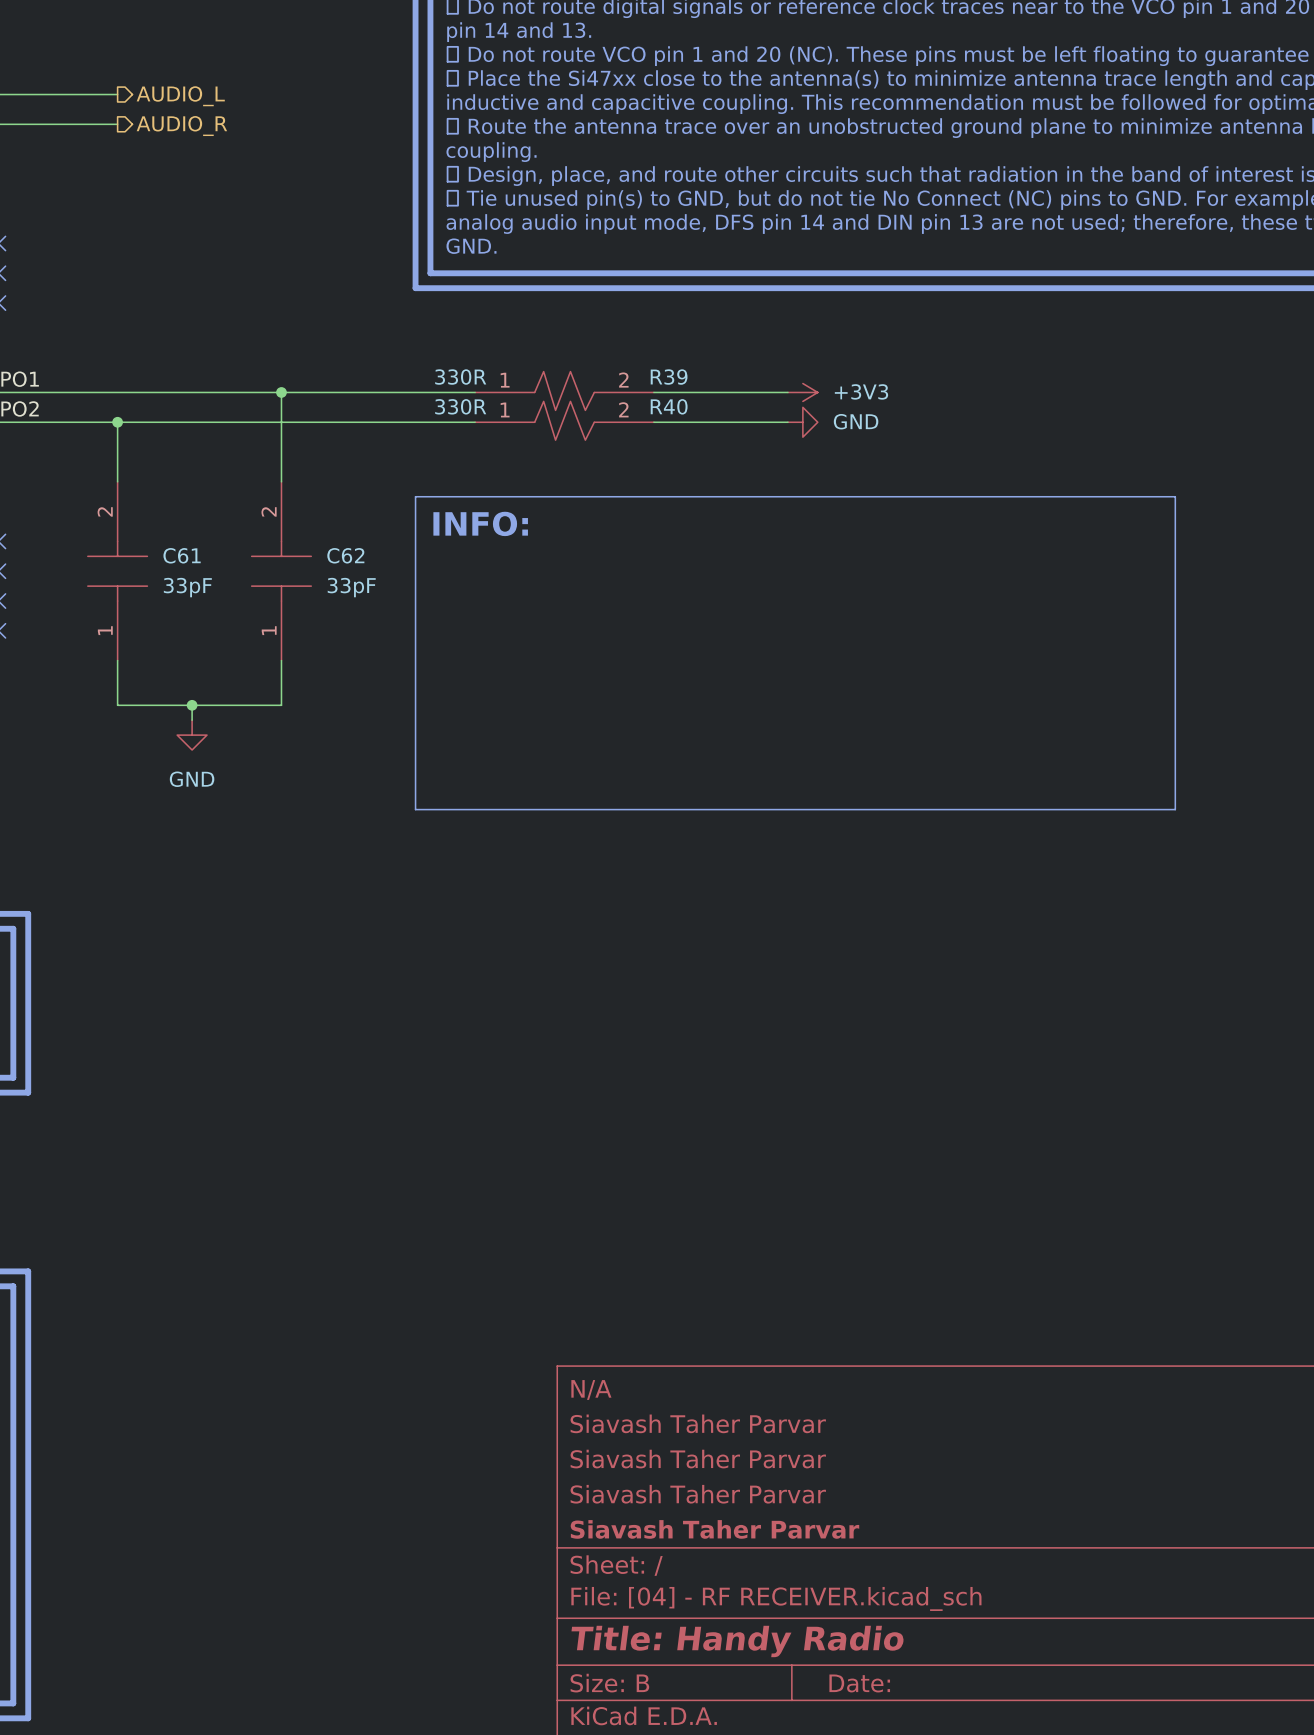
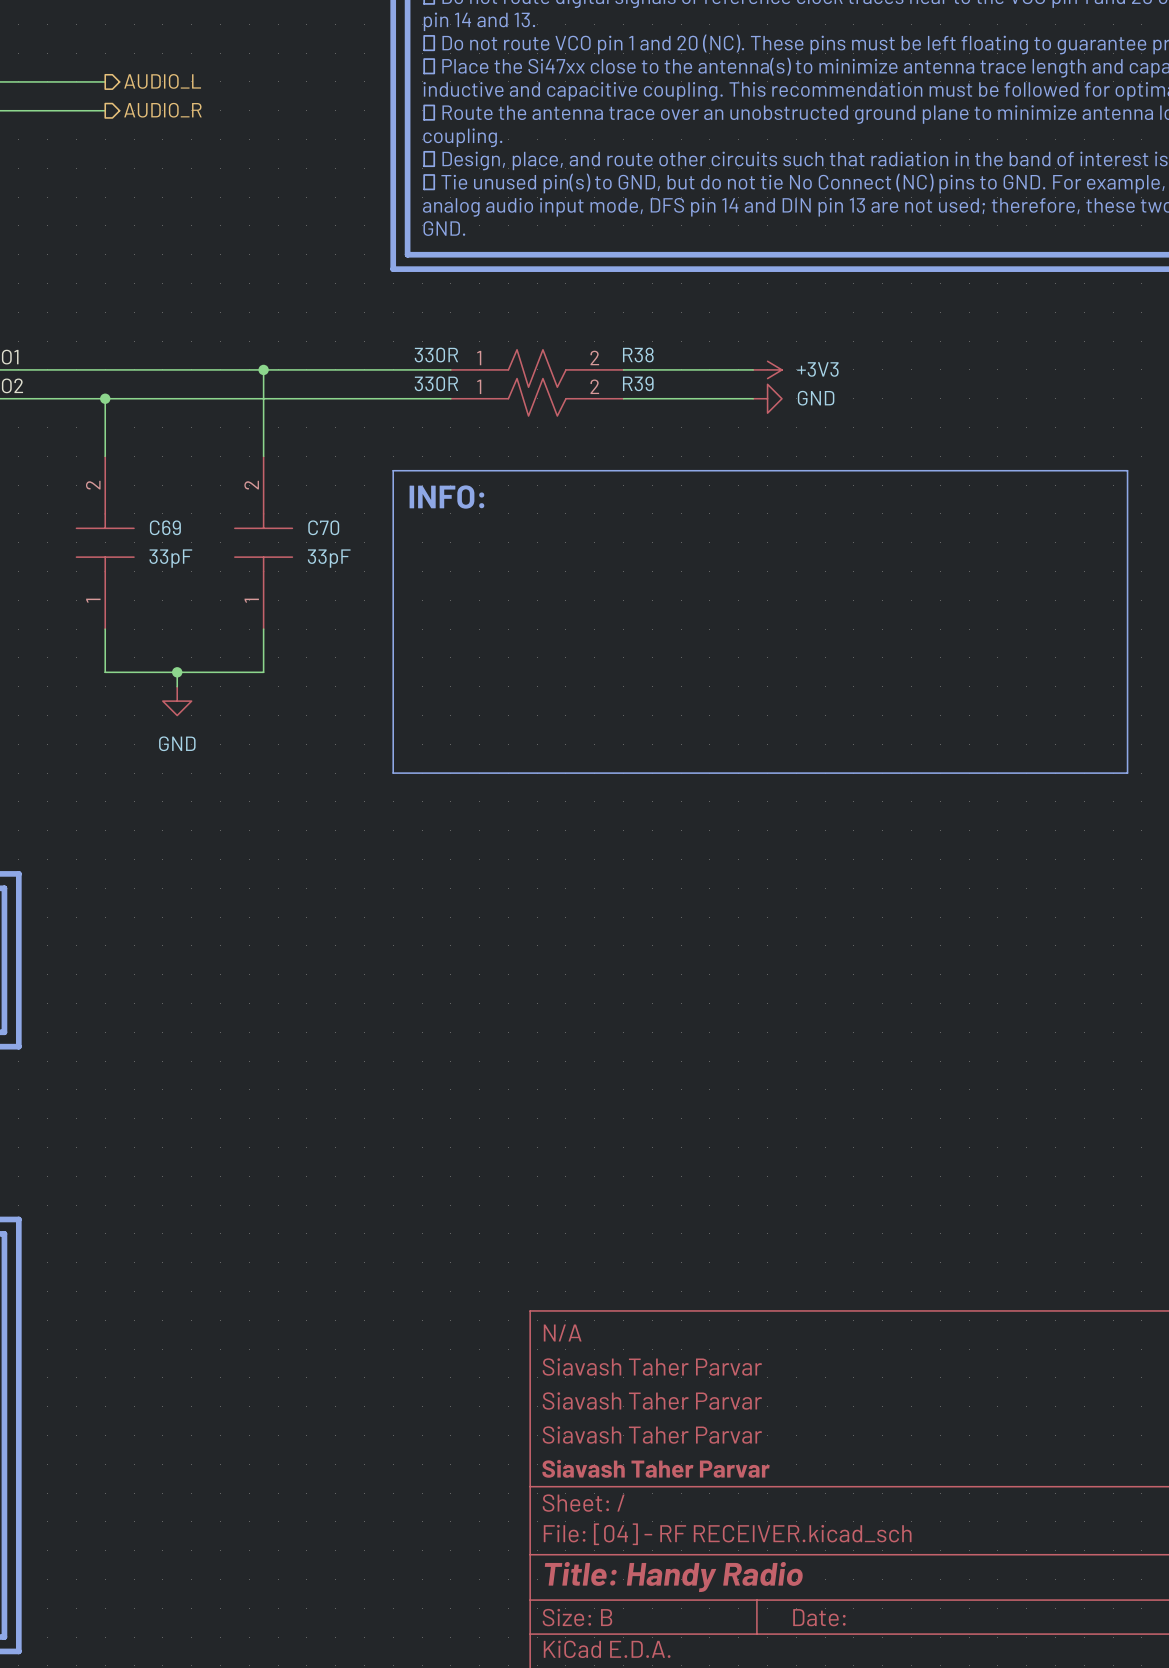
R39 name: R39 (669, 377) -> R38 (638, 354)
R40 name: R40 (669, 406) -> R39 (638, 383)
C61 name: C61 (182, 555) -> C69 (165, 527)
C62 name: C62 (345, 555) -> C70 (323, 527)

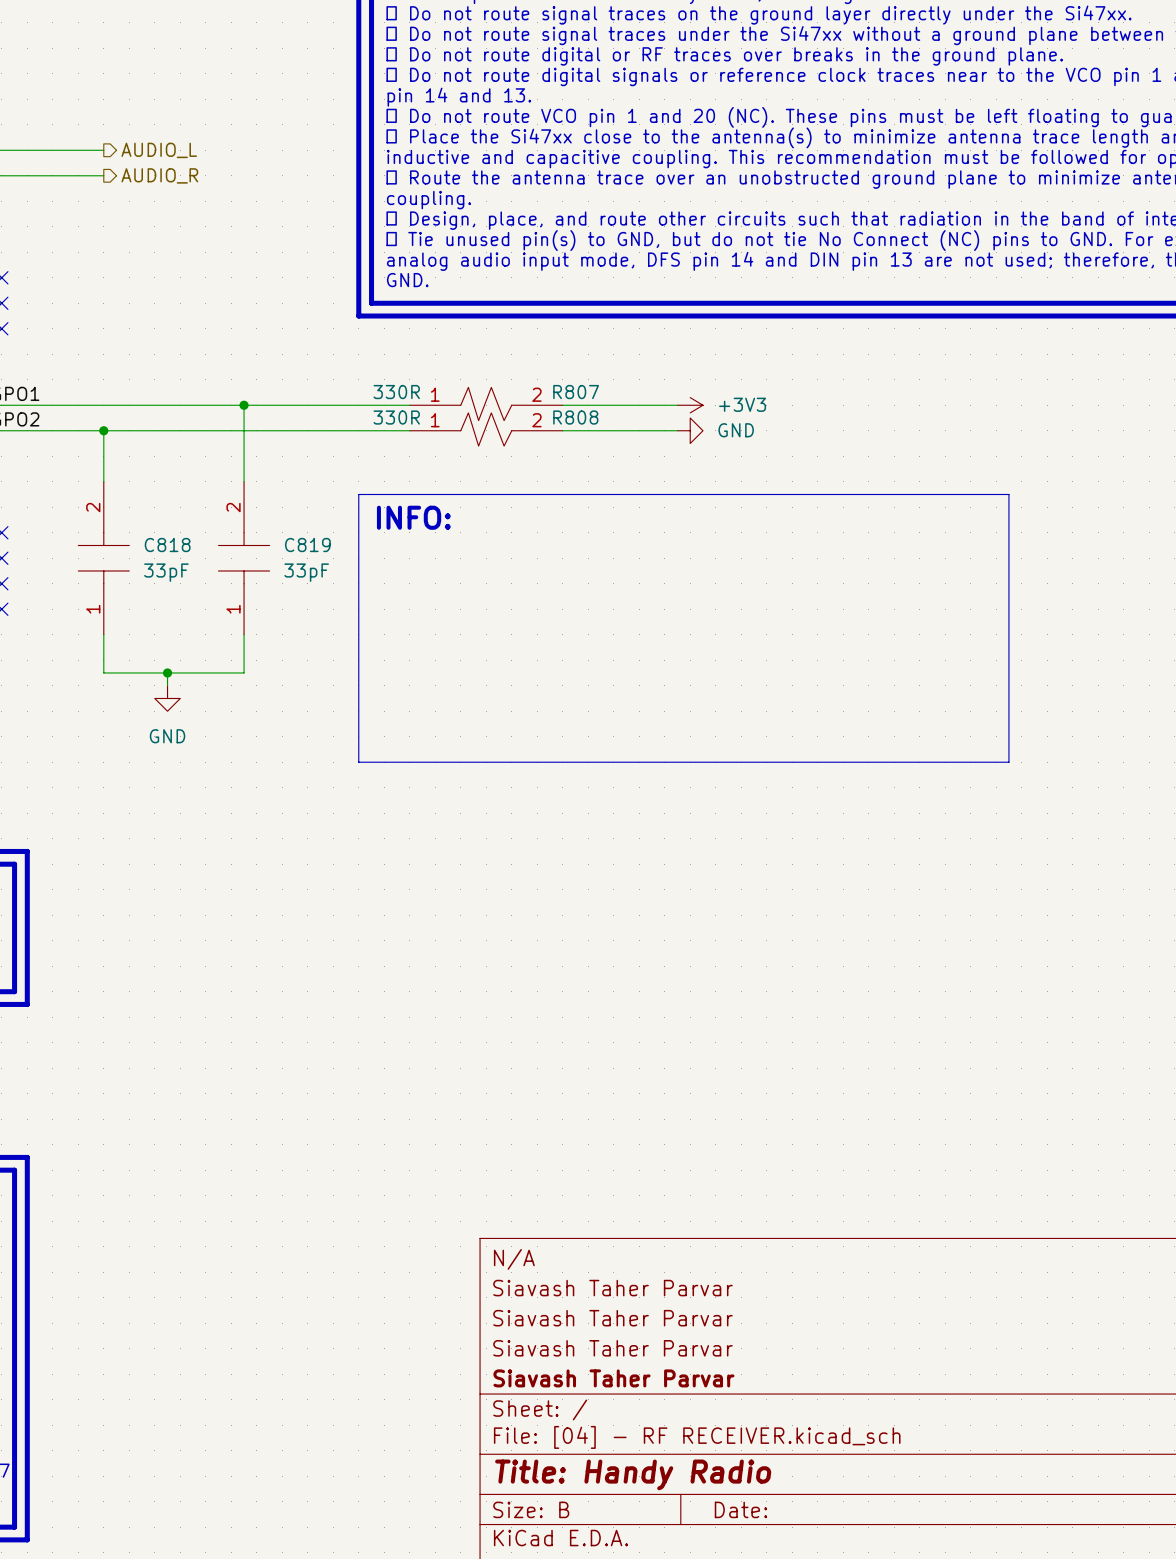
R38 name: R38 (638, 354) -> R807 (576, 392)
R39 name: R39 (638, 383) -> R808 (575, 417)
C69 name: C69 (165, 527) -> C818 (167, 545)
C70 name: C70 (323, 527) -> C819 (307, 545)

